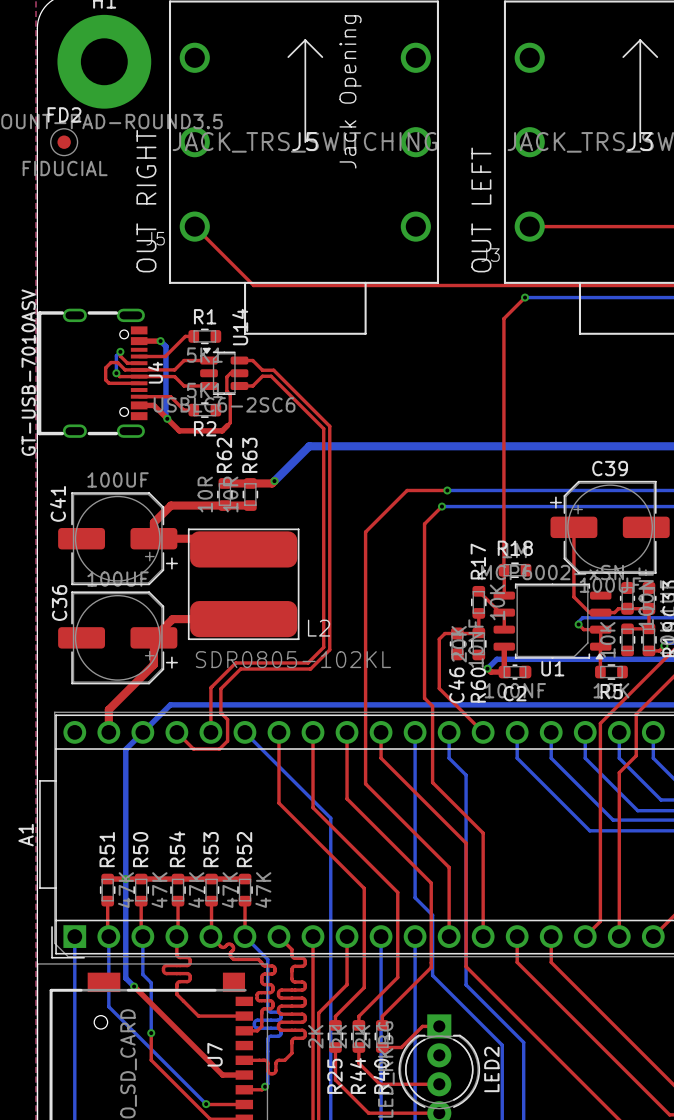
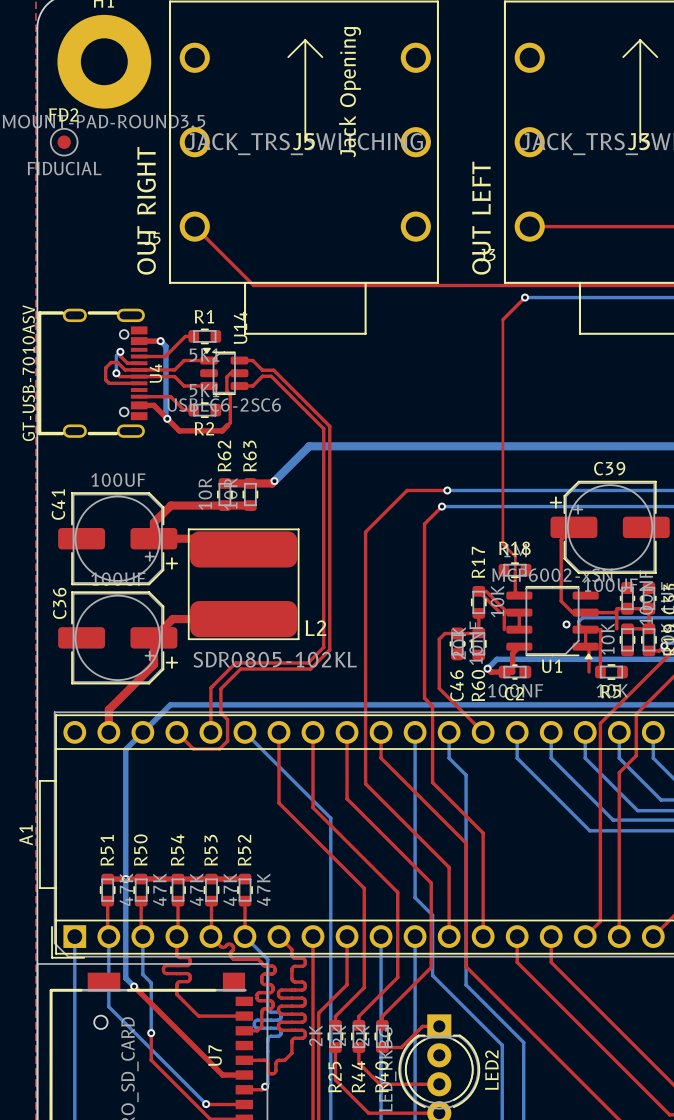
top track: (503, 318) (503, 570) -> (503, 318) (502, 544) (515, 556) (515, 591) (519, 595)
top track: (573, 527) (573, 597) (589, 612) -> (573, 527) (561, 540) (561, 601) (572, 612) (589, 612)
top track: (504, 570) (504, 595) -> none
U1 footprint: [493, 583, 612, 660] -> [506, 586, 599, 660]
top track: none -> (486, 591) (507, 612) (519, 612) (519, 629)
top track: none -> (616, 608) (616, 628)
via position: (578, 624) -> (566, 624)
top track: none -> (585, 629) (585, 646) (589, 649) (589, 672)
top track: (504, 646) (504, 671) -> (519, 646) (512, 653) (512, 672) (504, 672)

